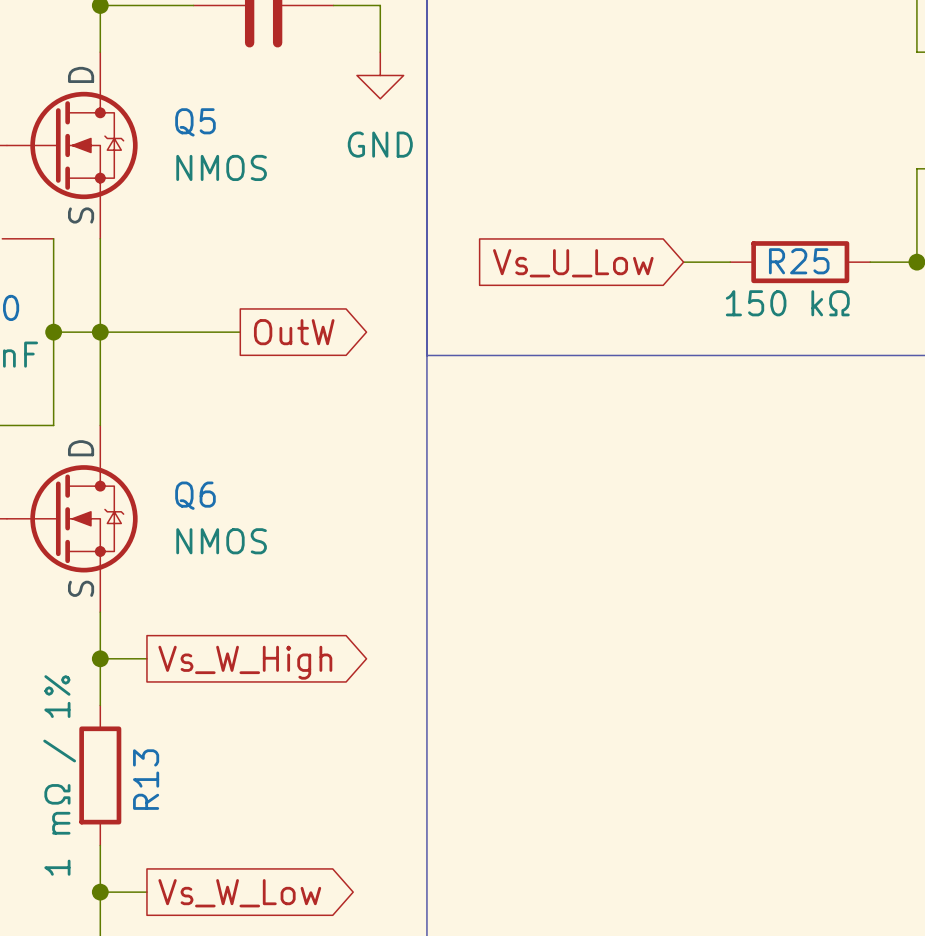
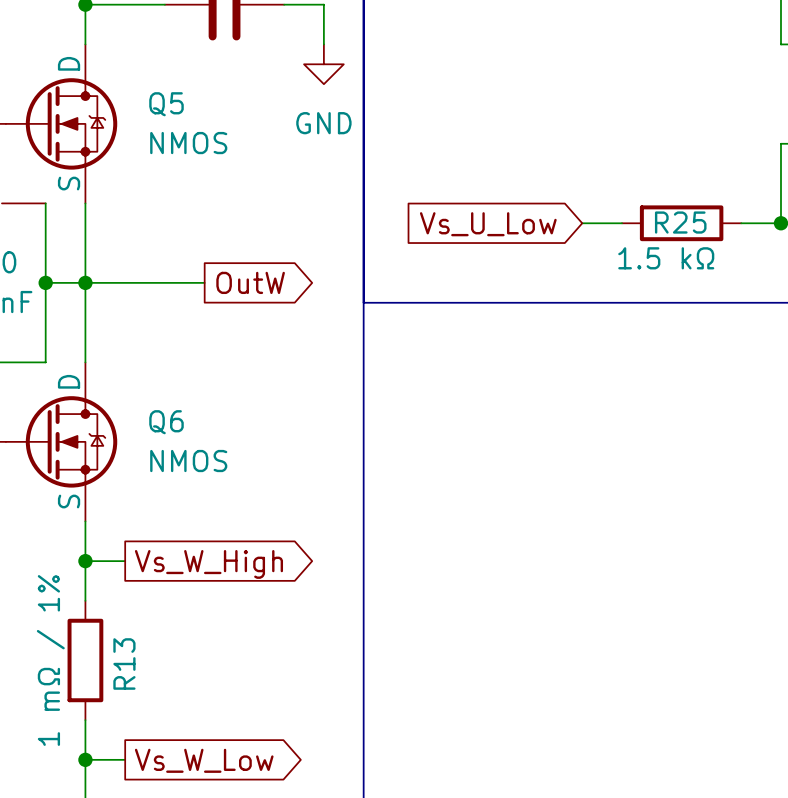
R25 value: 150 kΩ (787, 303) -> 1.5 kΩ (666, 258)

